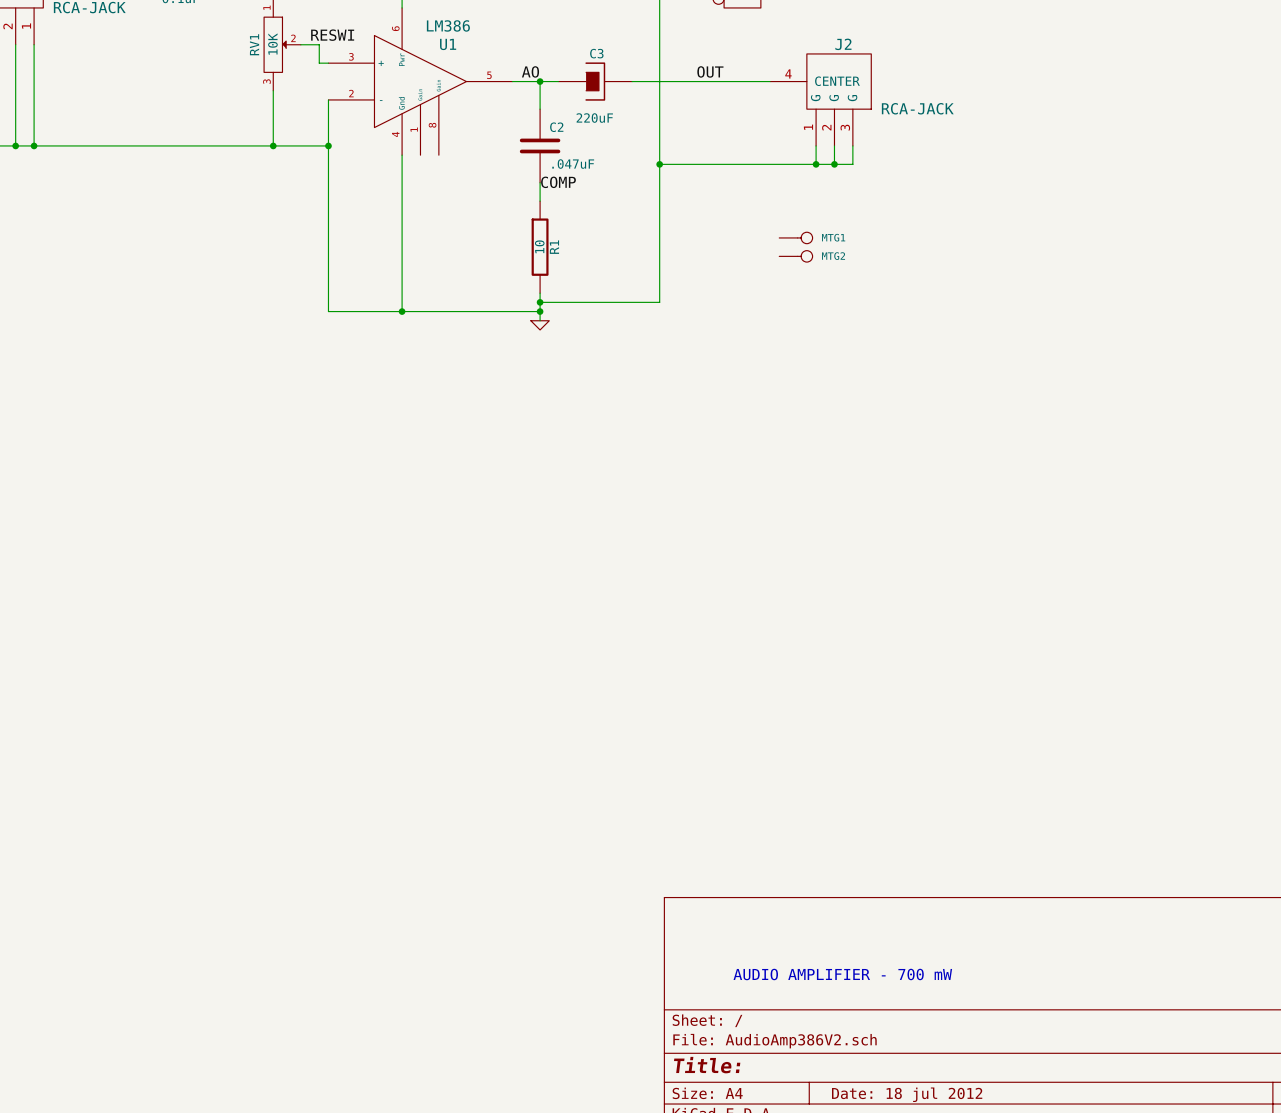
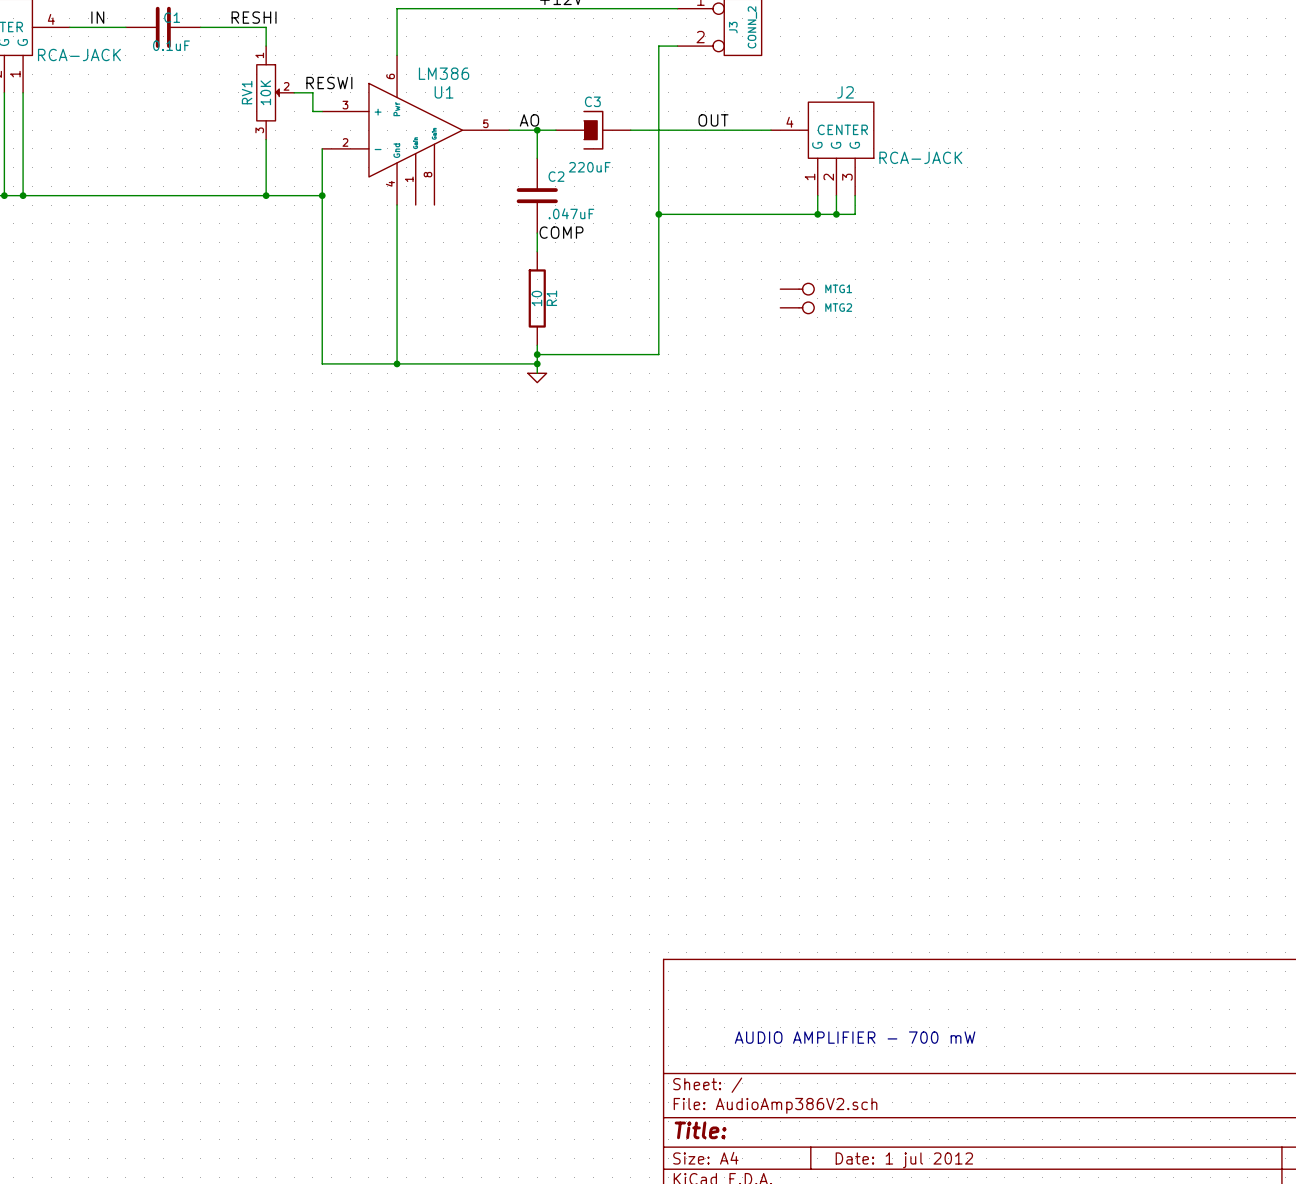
title block: Date: 18 jul 2012 (907, 1094) -> Date: 1 jul 2012 (904, 1160)

